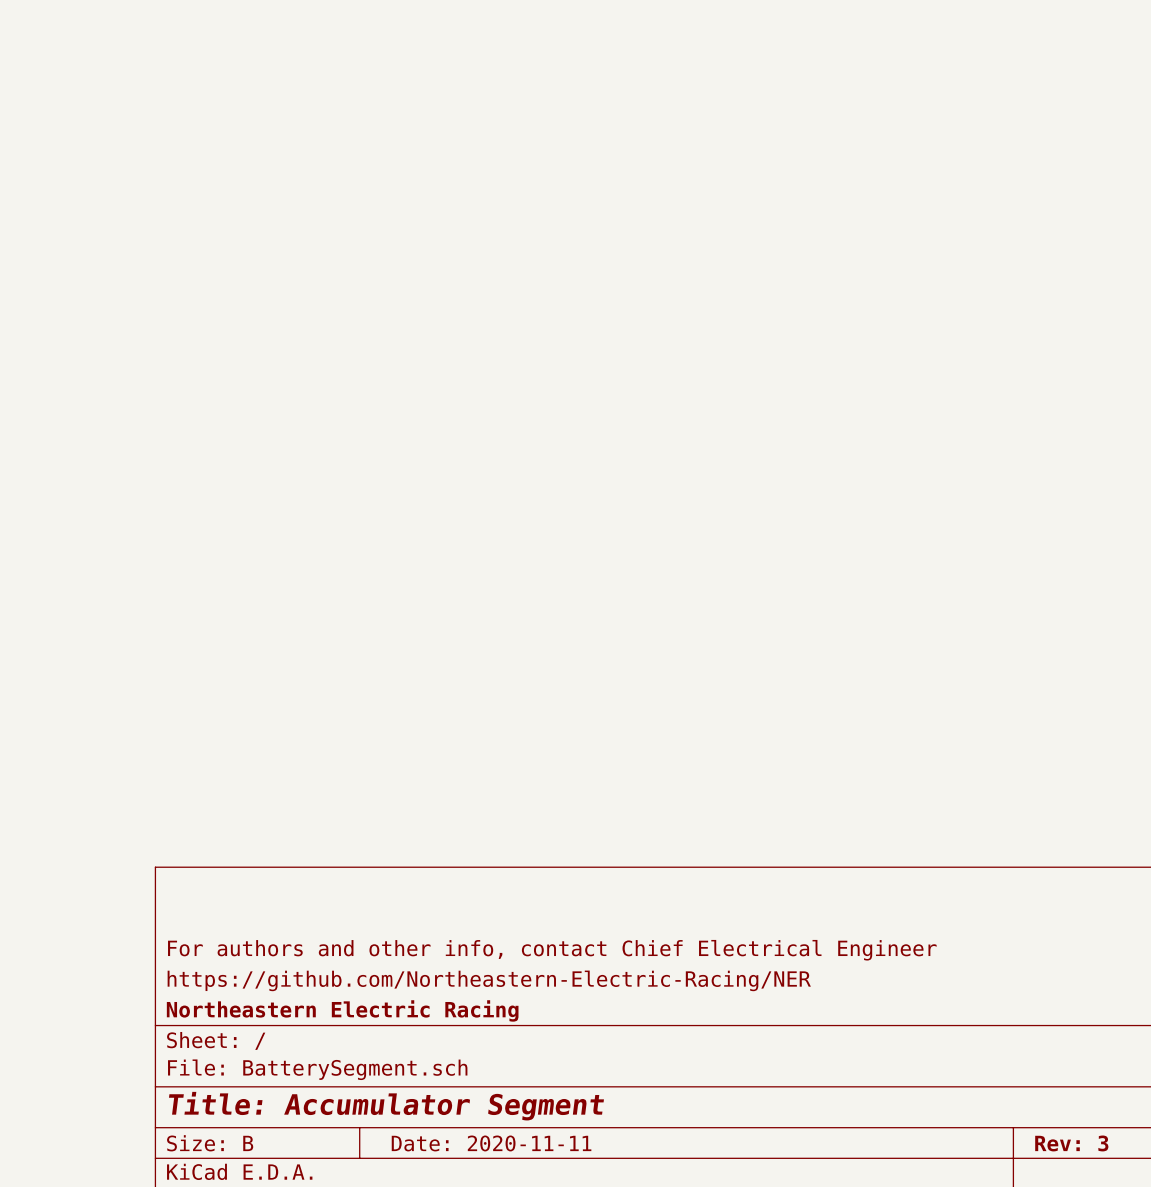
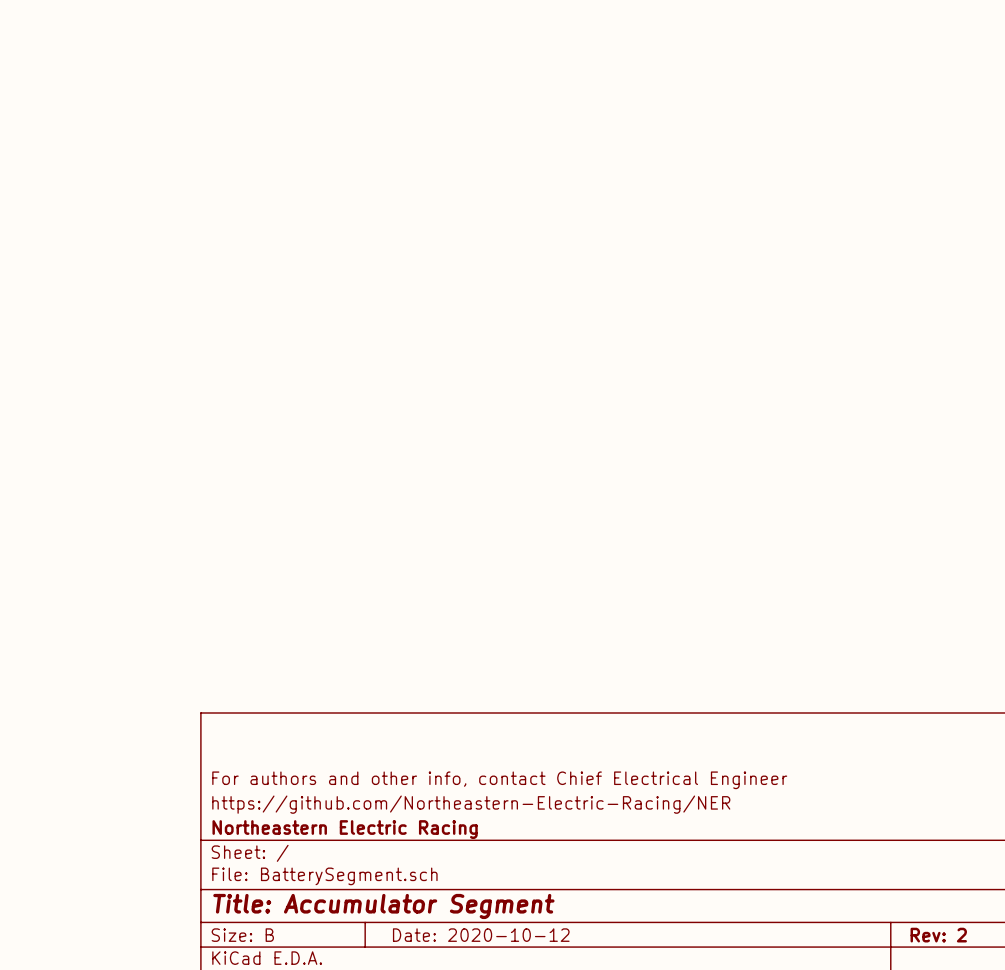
title block: Date: 2020-11-11 (491, 1143) -> Date: 2020-10-12 (481, 935)
title block: Rev: 3 (1071, 1143) -> Rev: 2 (938, 935)

